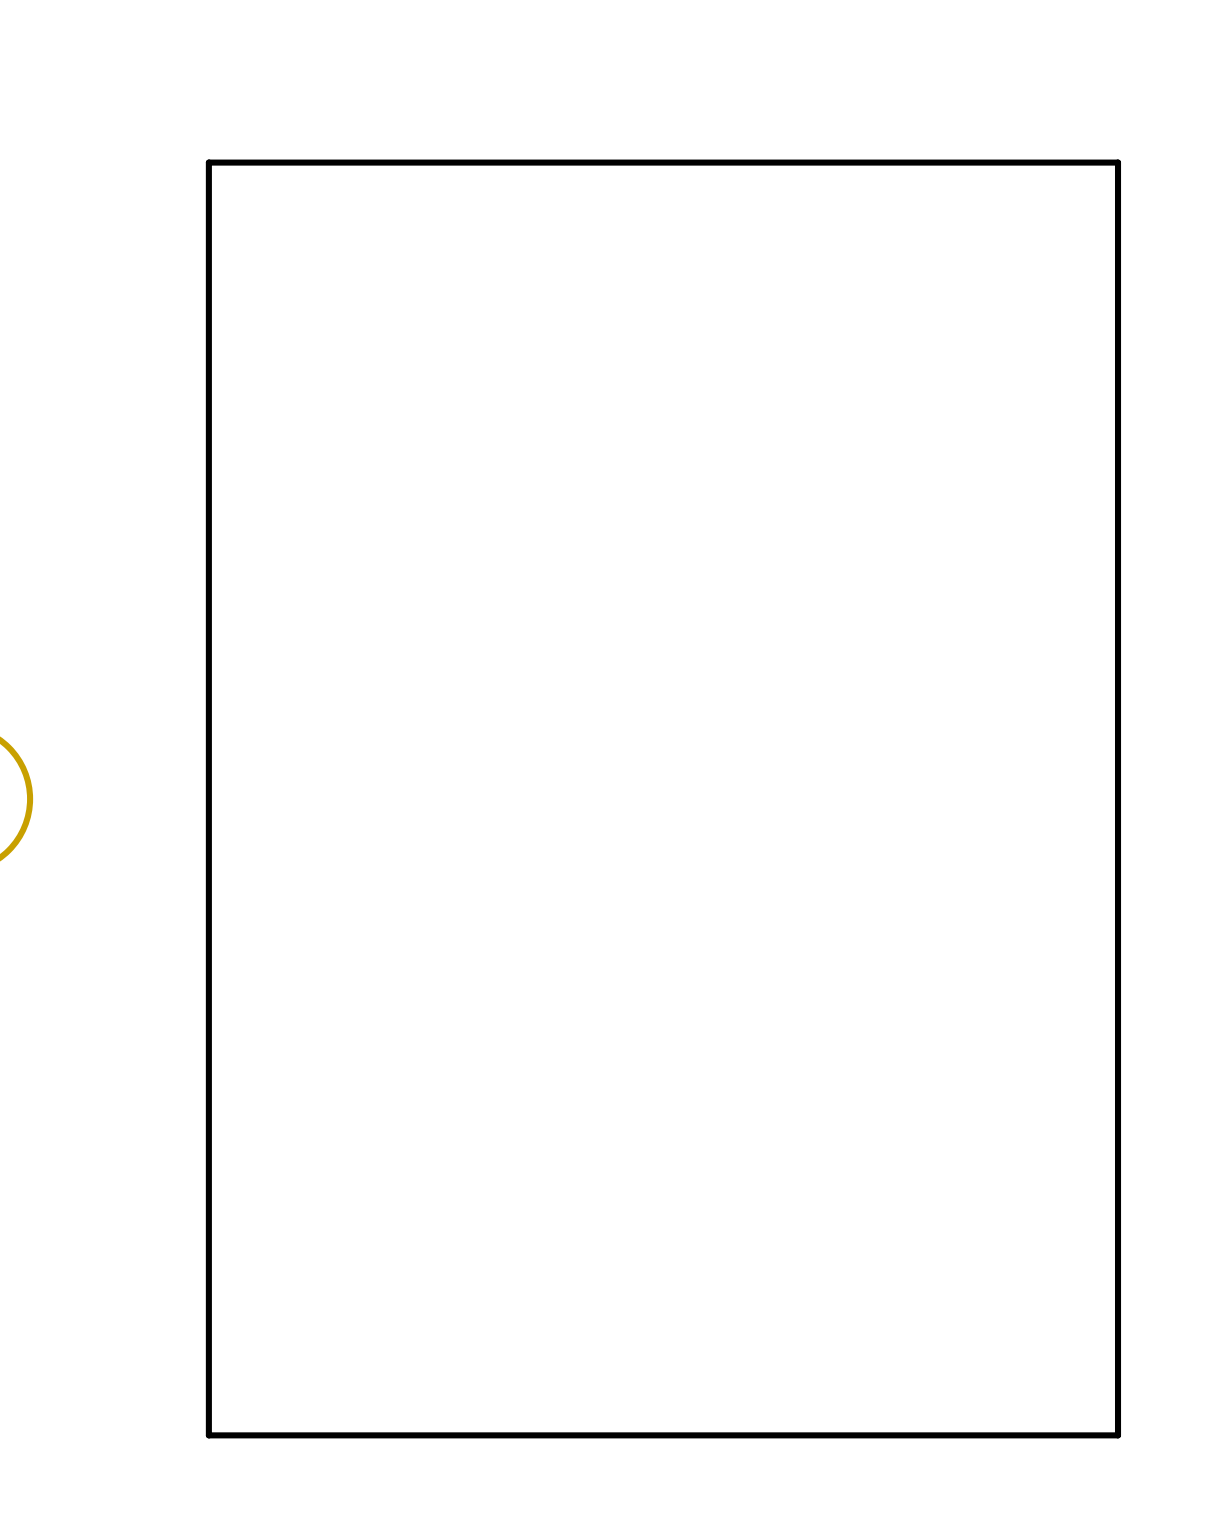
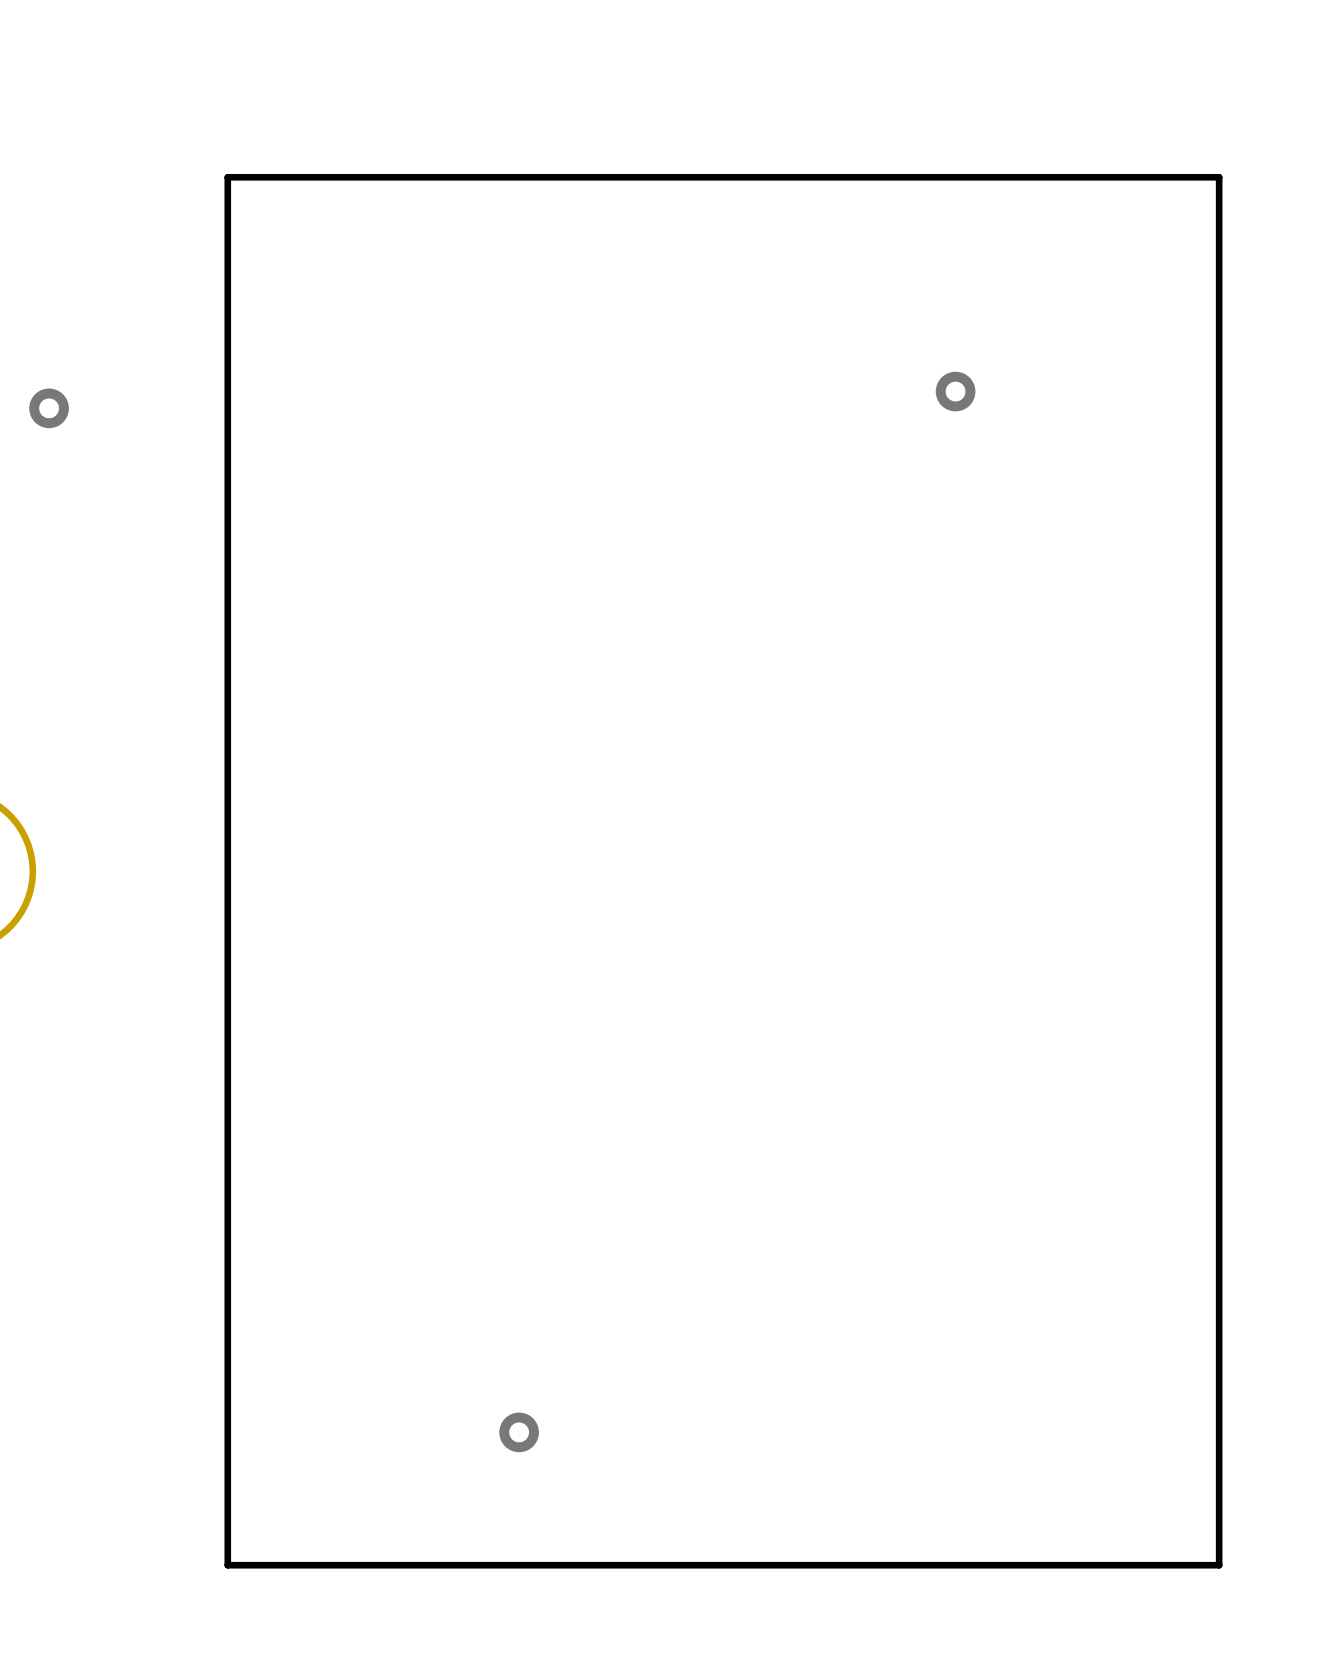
via: none -> (955, 391)
via: none -> (49, 408)
via: none -> (519, 1432)

